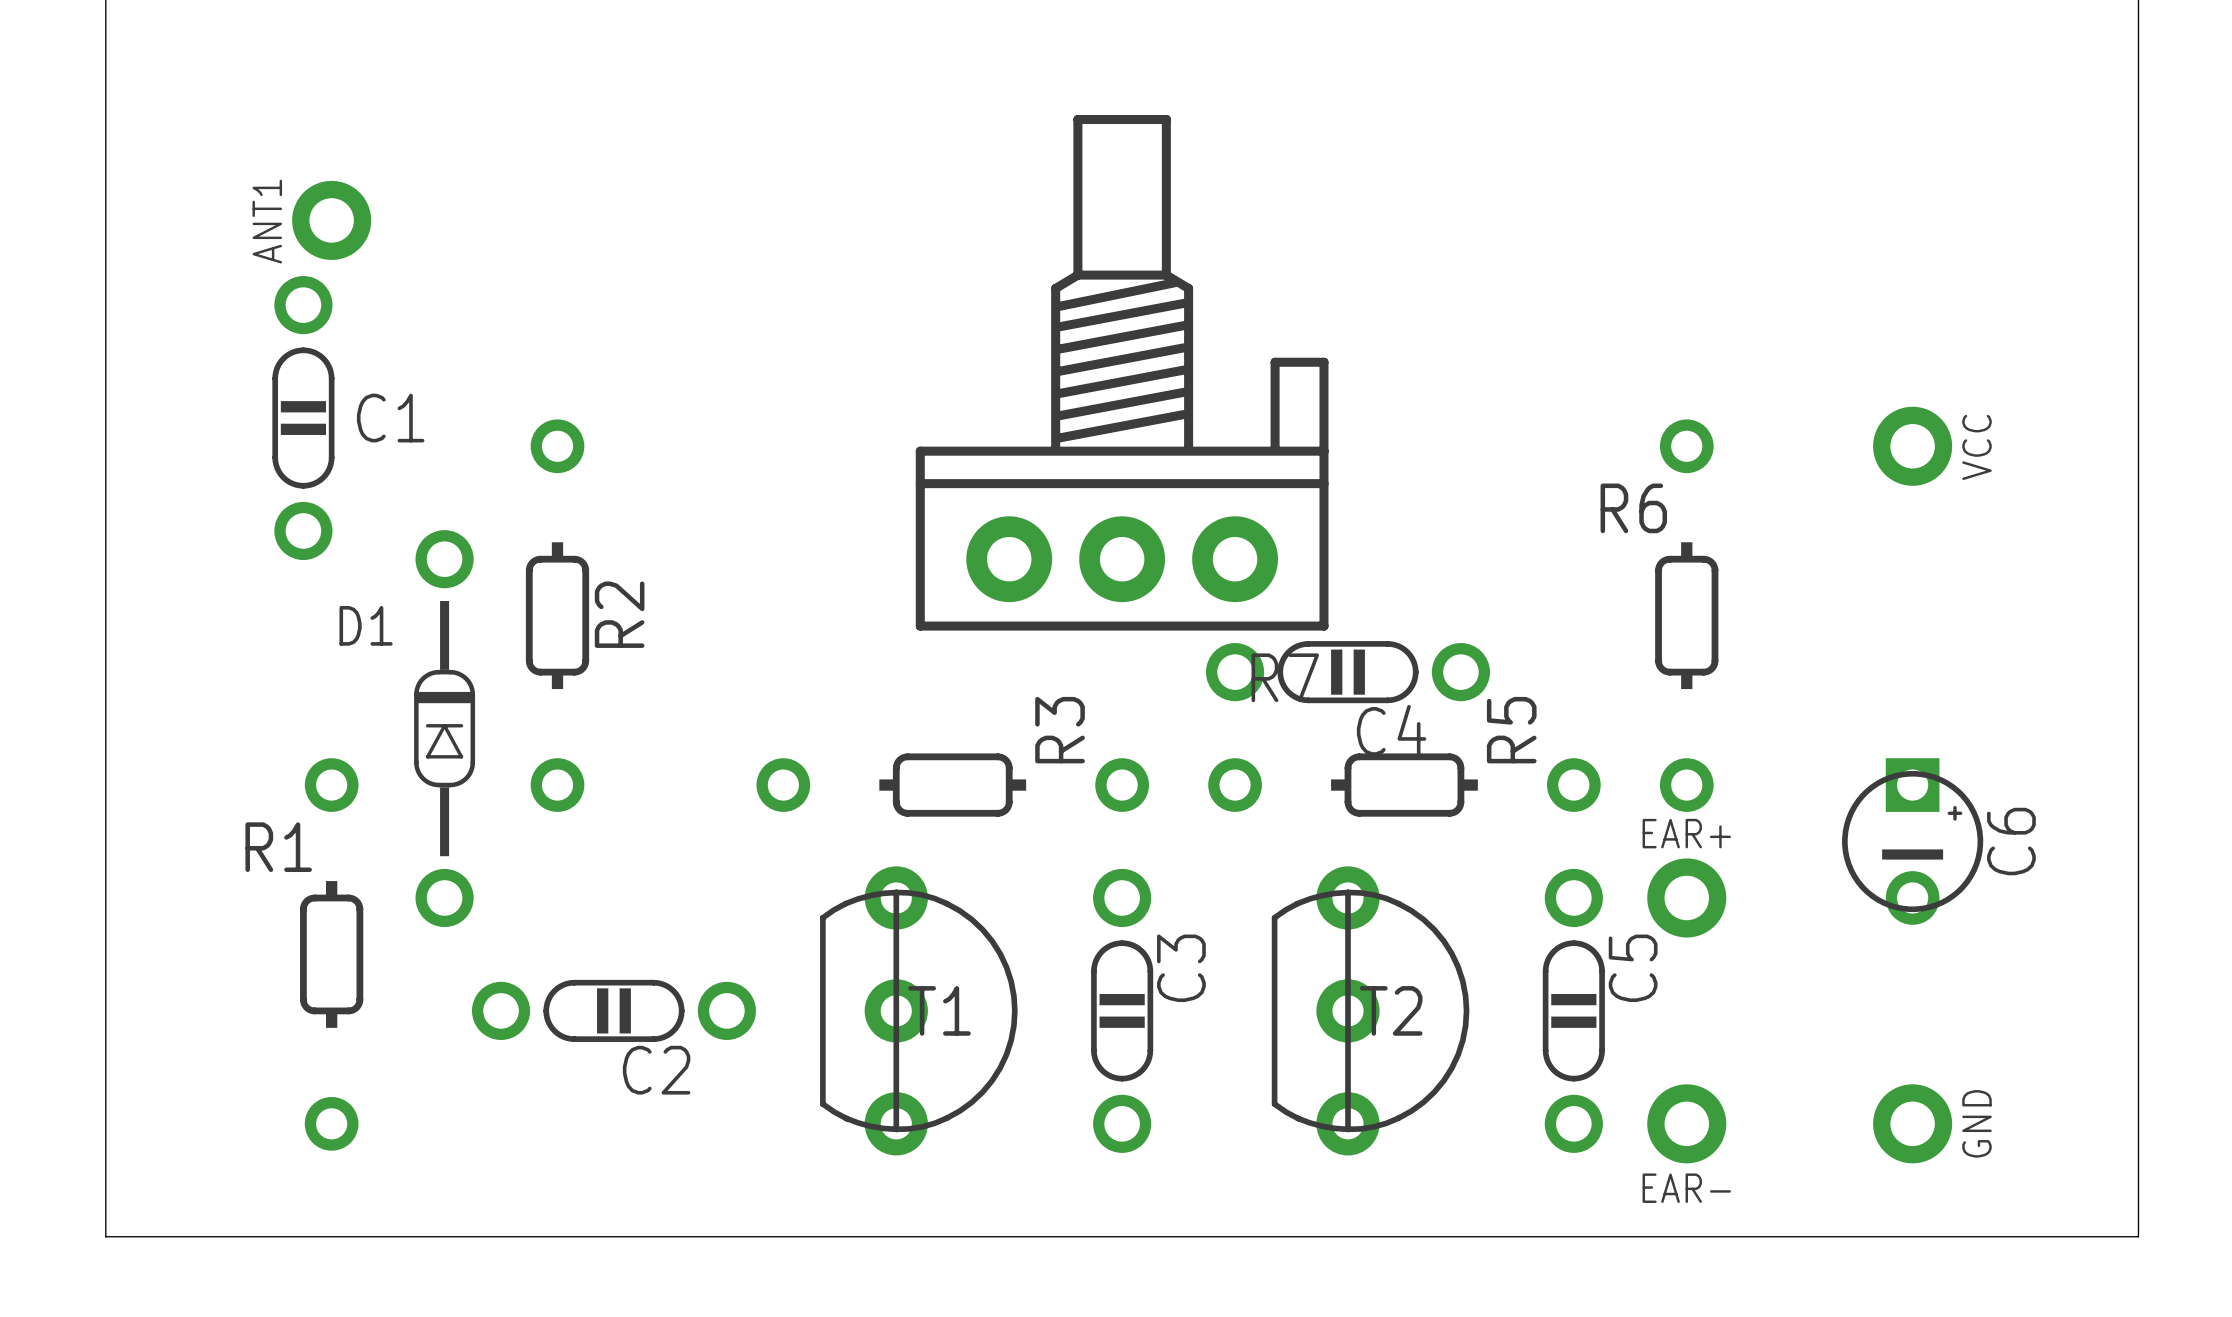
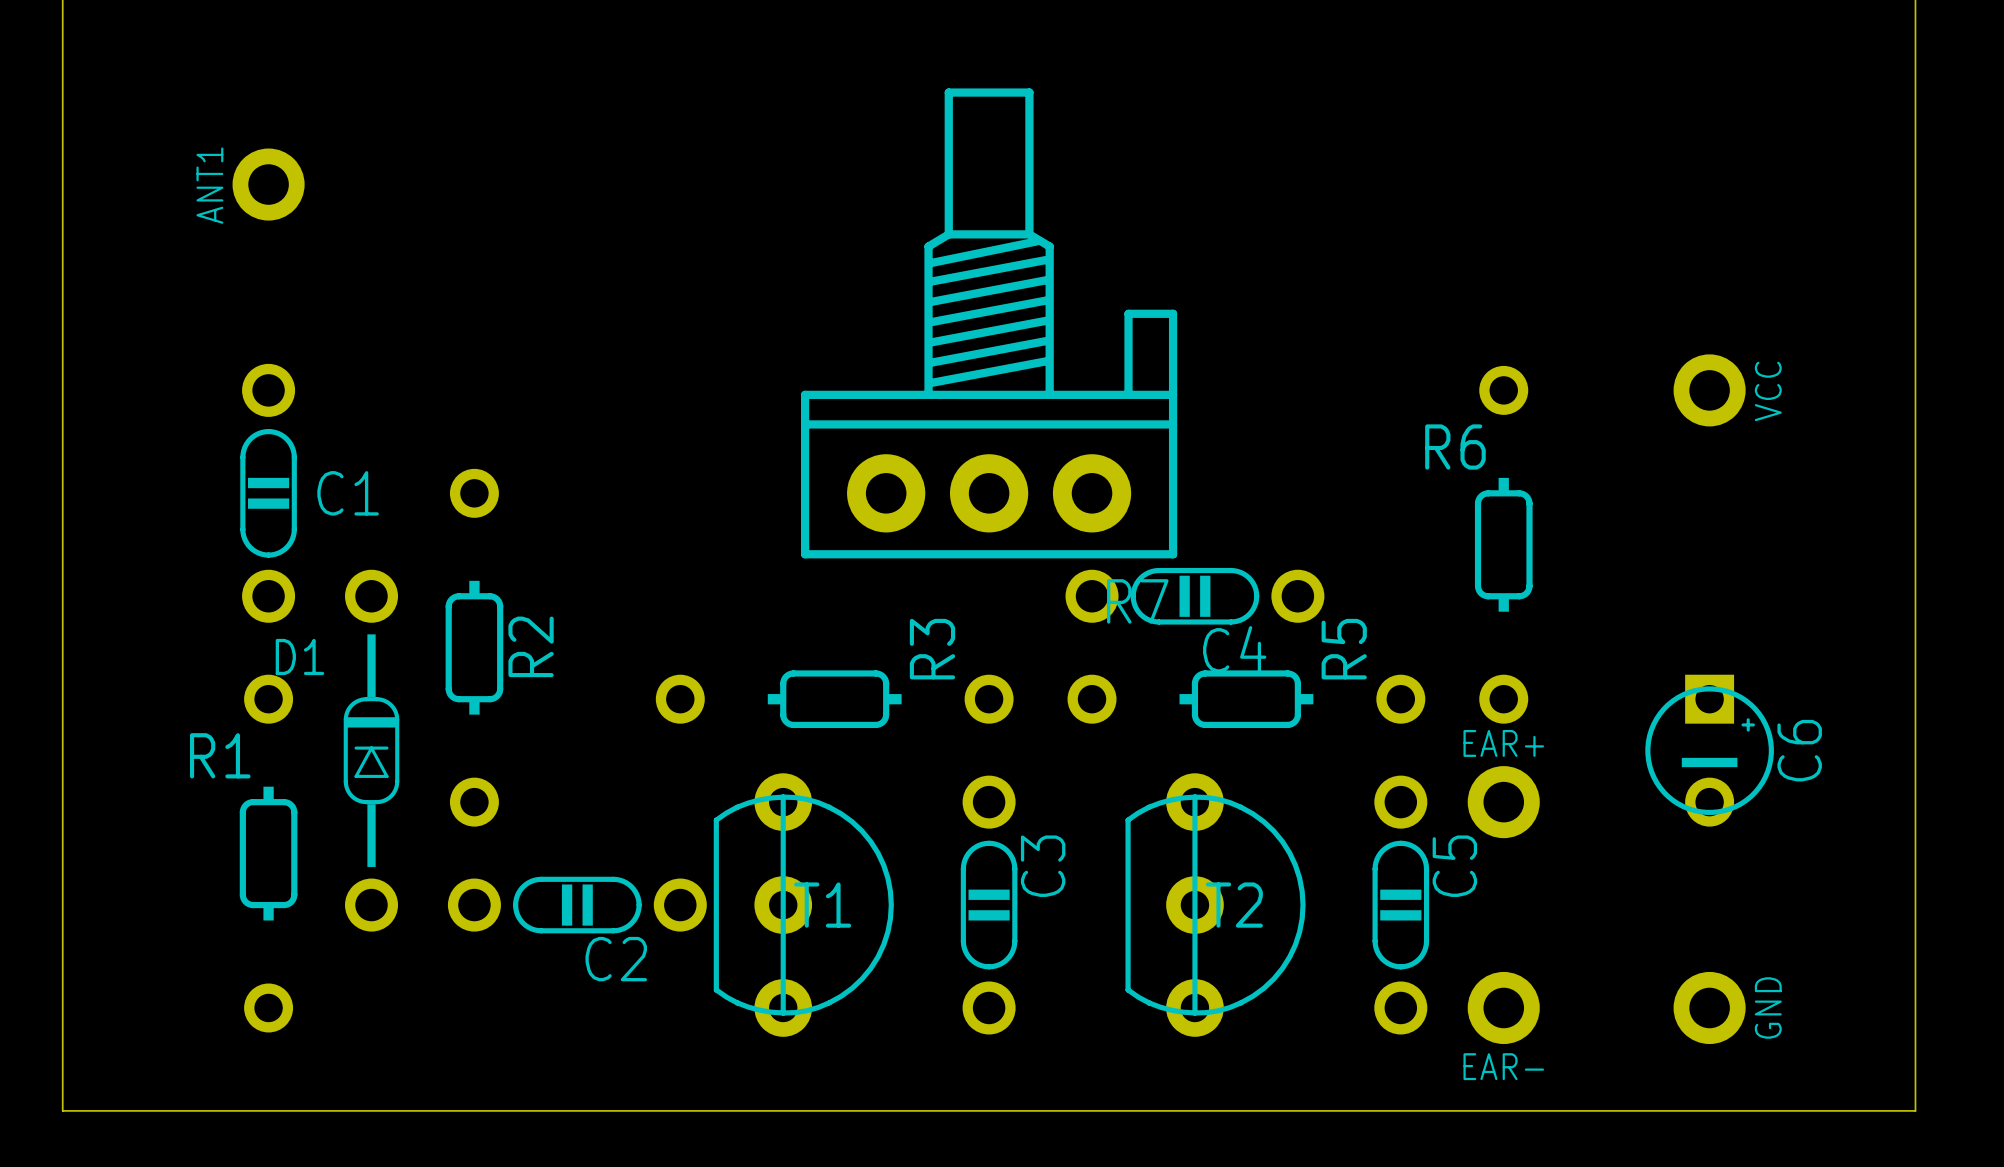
C1 position: (303, 418) -> (268, 493)
R2 position: (557, 615) -> (474, 647)
D1 position: (444, 728) -> (371, 750)
C2 position: (613, 1010) -> (577, 905)

